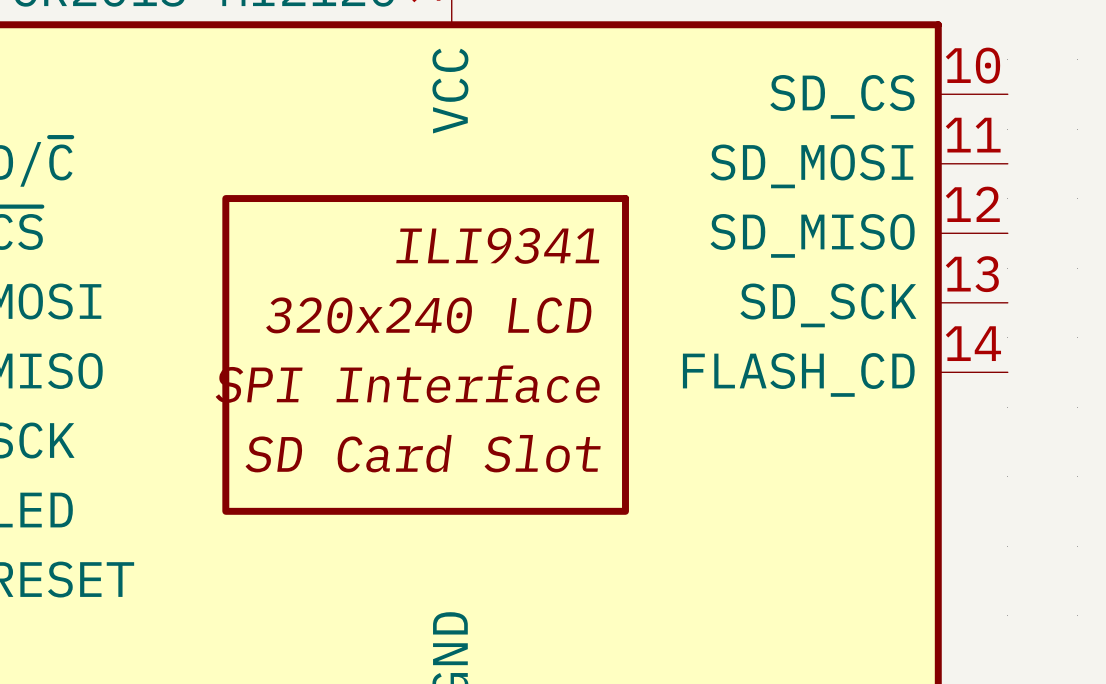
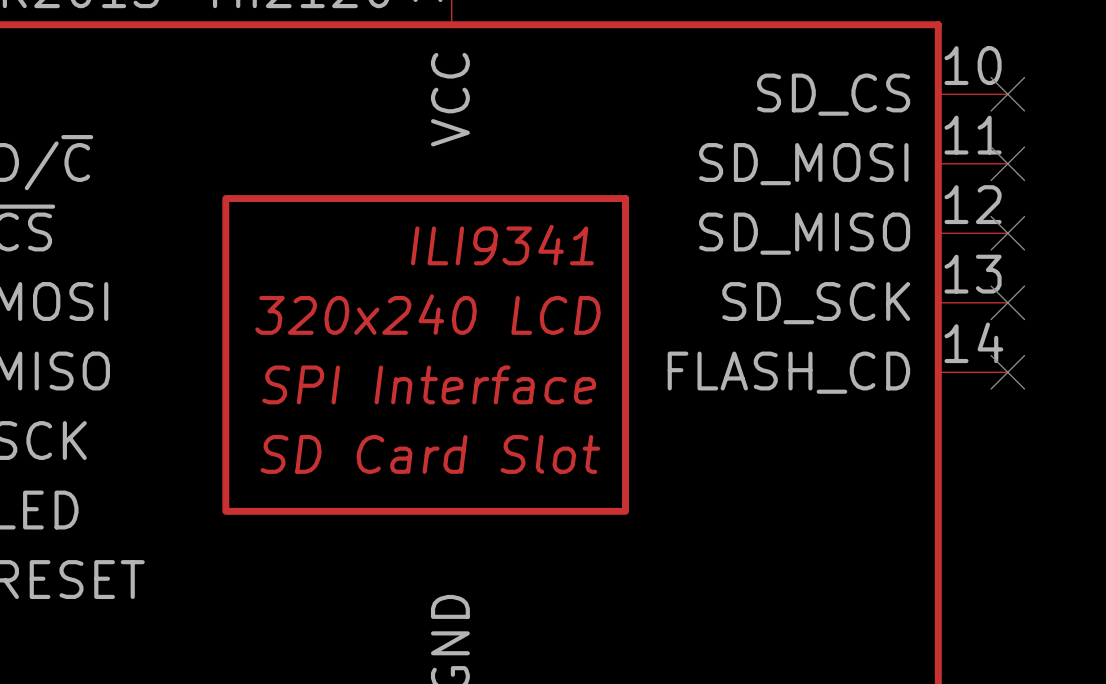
no-connect mark: none -> (1007, 94)
no-connect mark: none -> (1007, 163)
no-connect mark: none -> (1007, 233)
no-connect mark: none -> (1007, 302)
no-connect mark: none -> (1007, 372)

